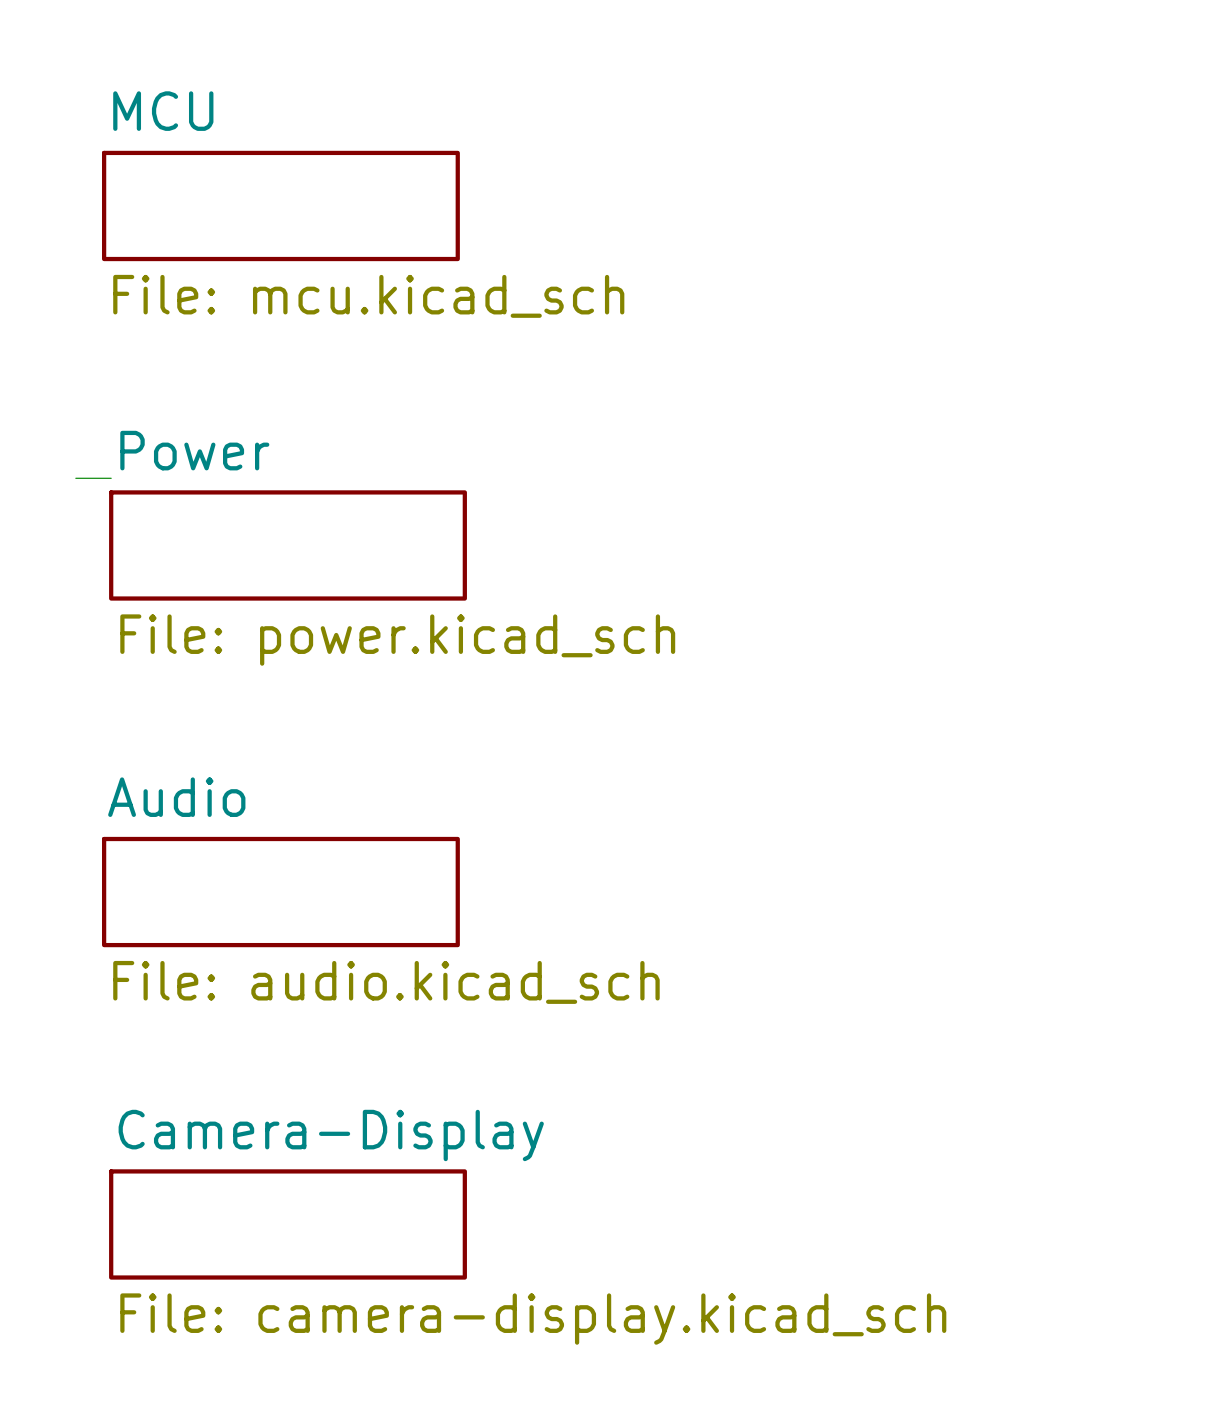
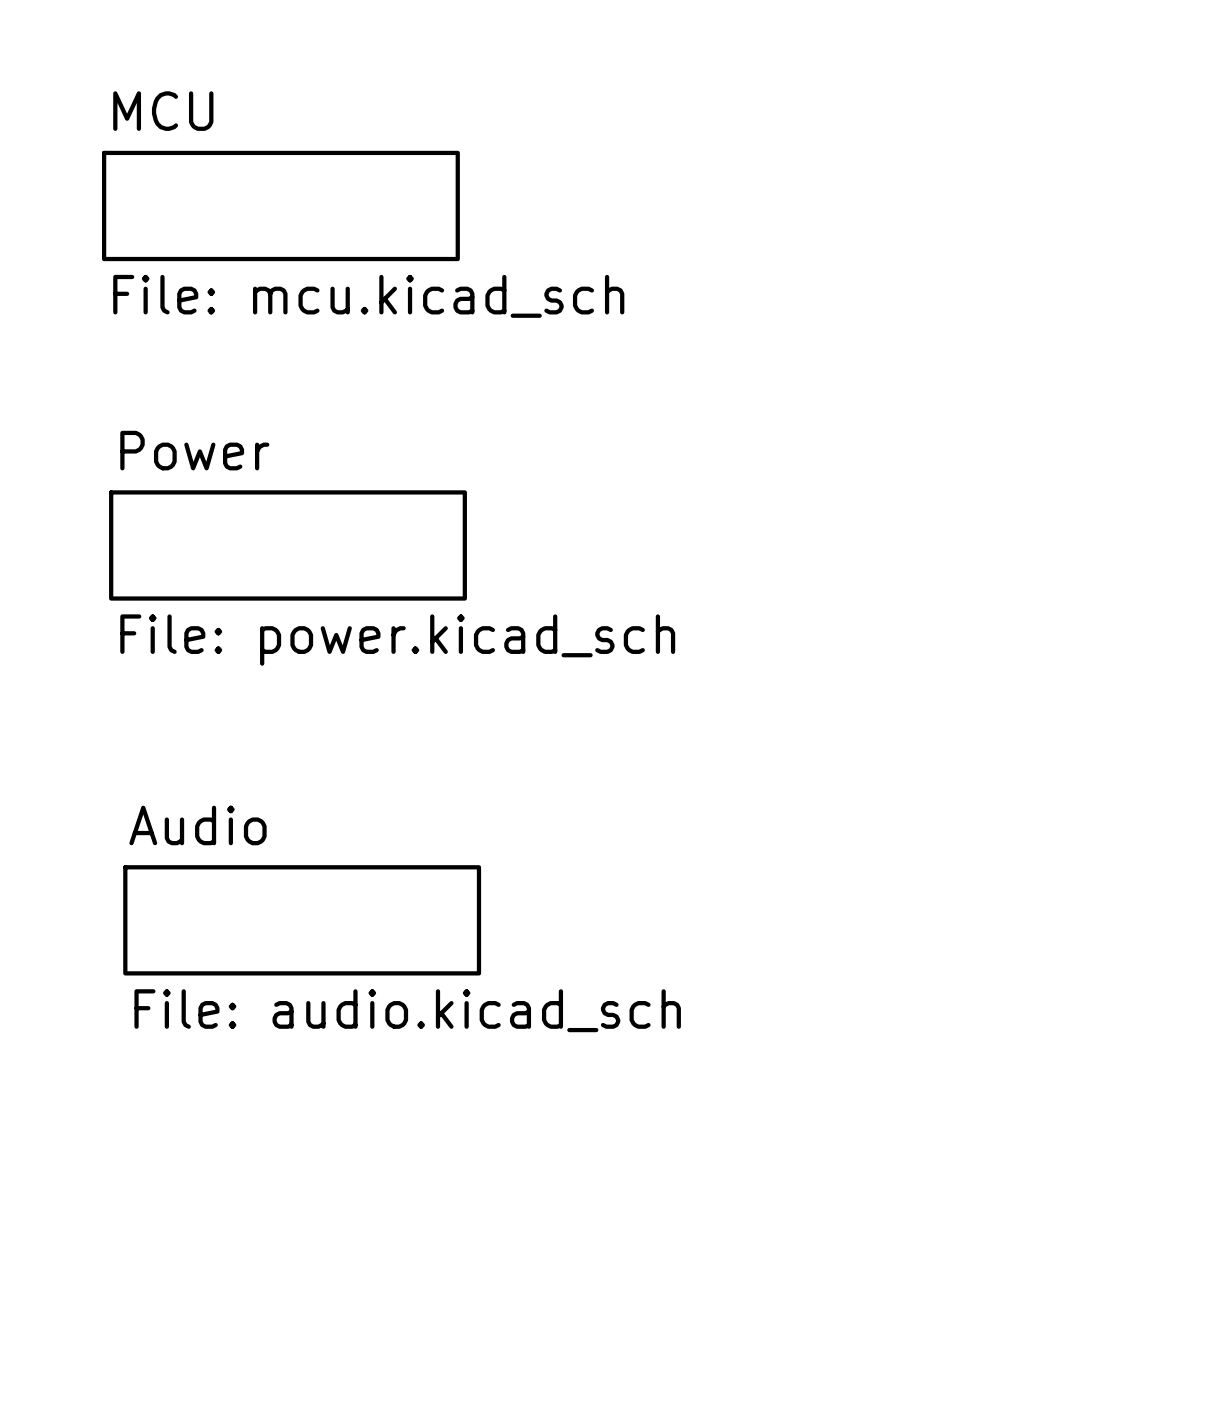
wire: (75, 478) (111, 478) -> none
sheet Audio position: (280, 892) -> (302, 920)
sheet Camera-Display: File: camera-display.kicad_sch (288, 1224) -> none

